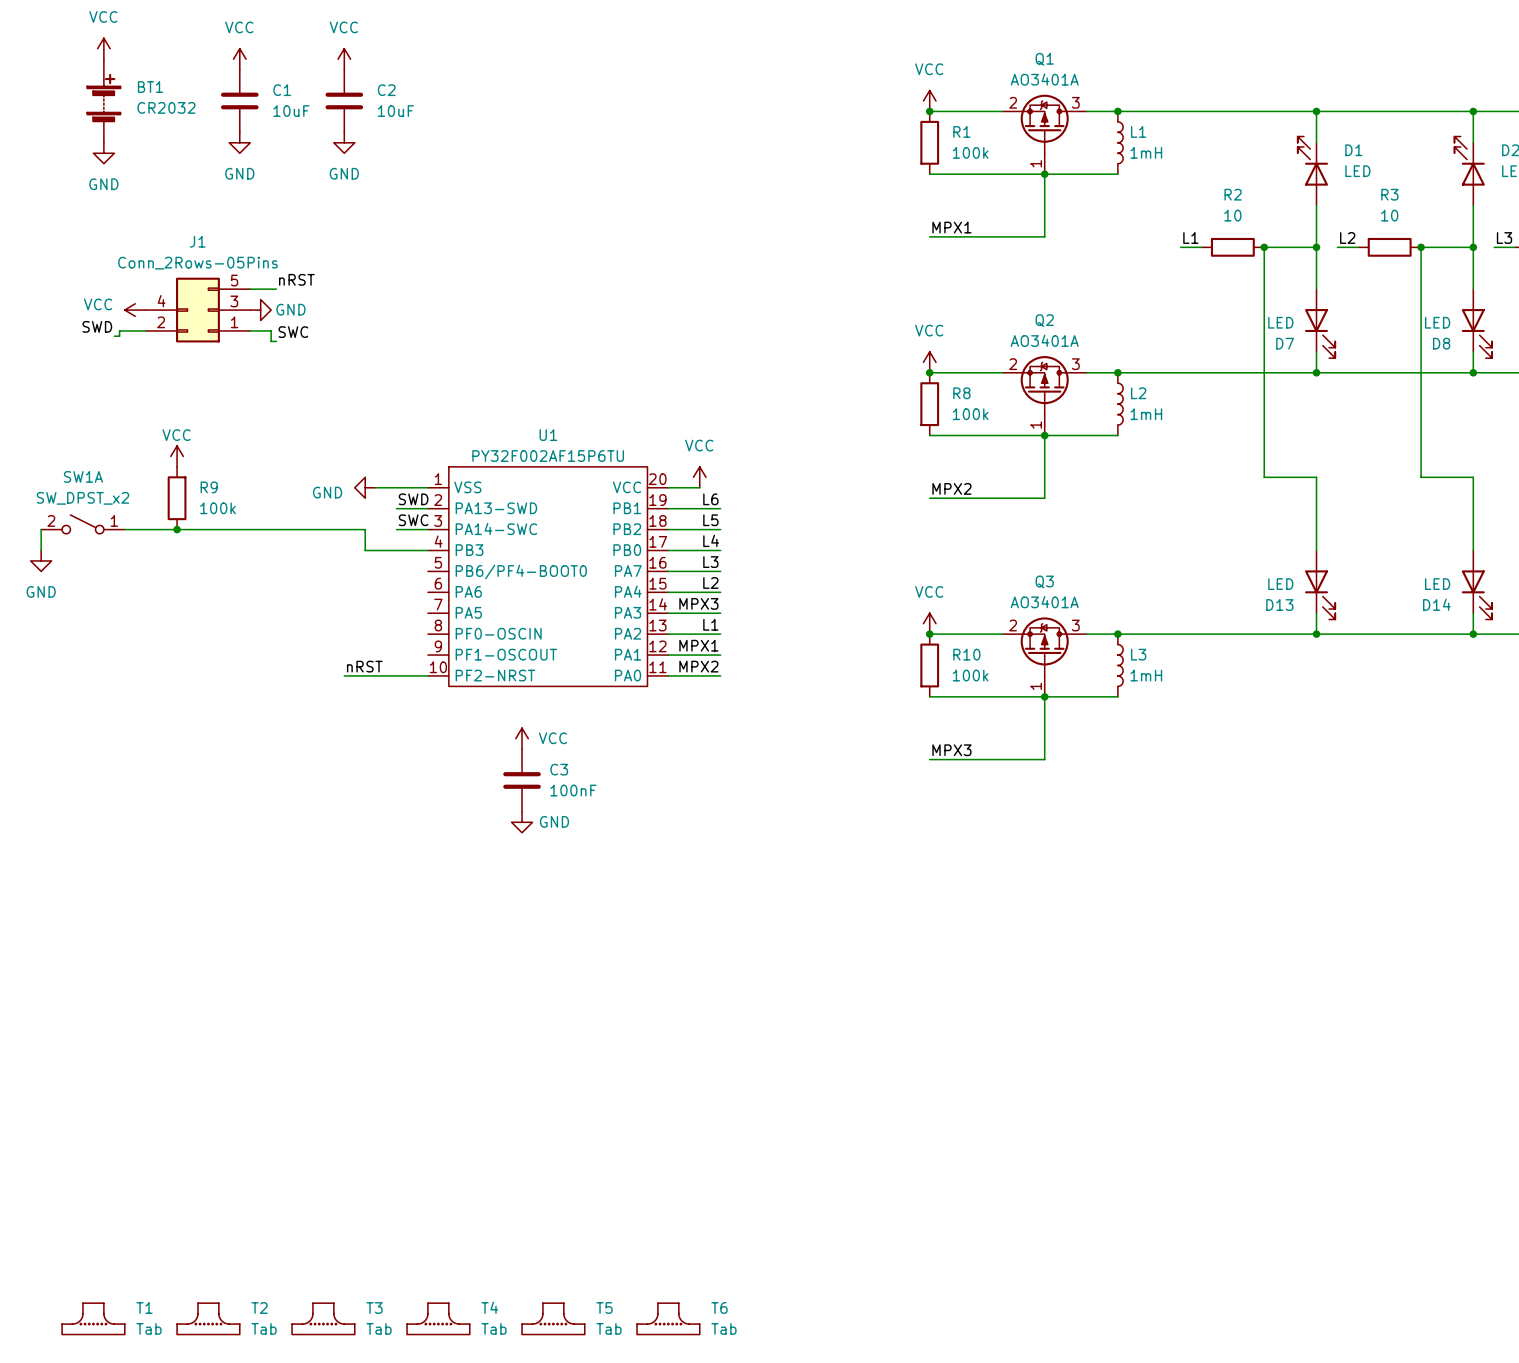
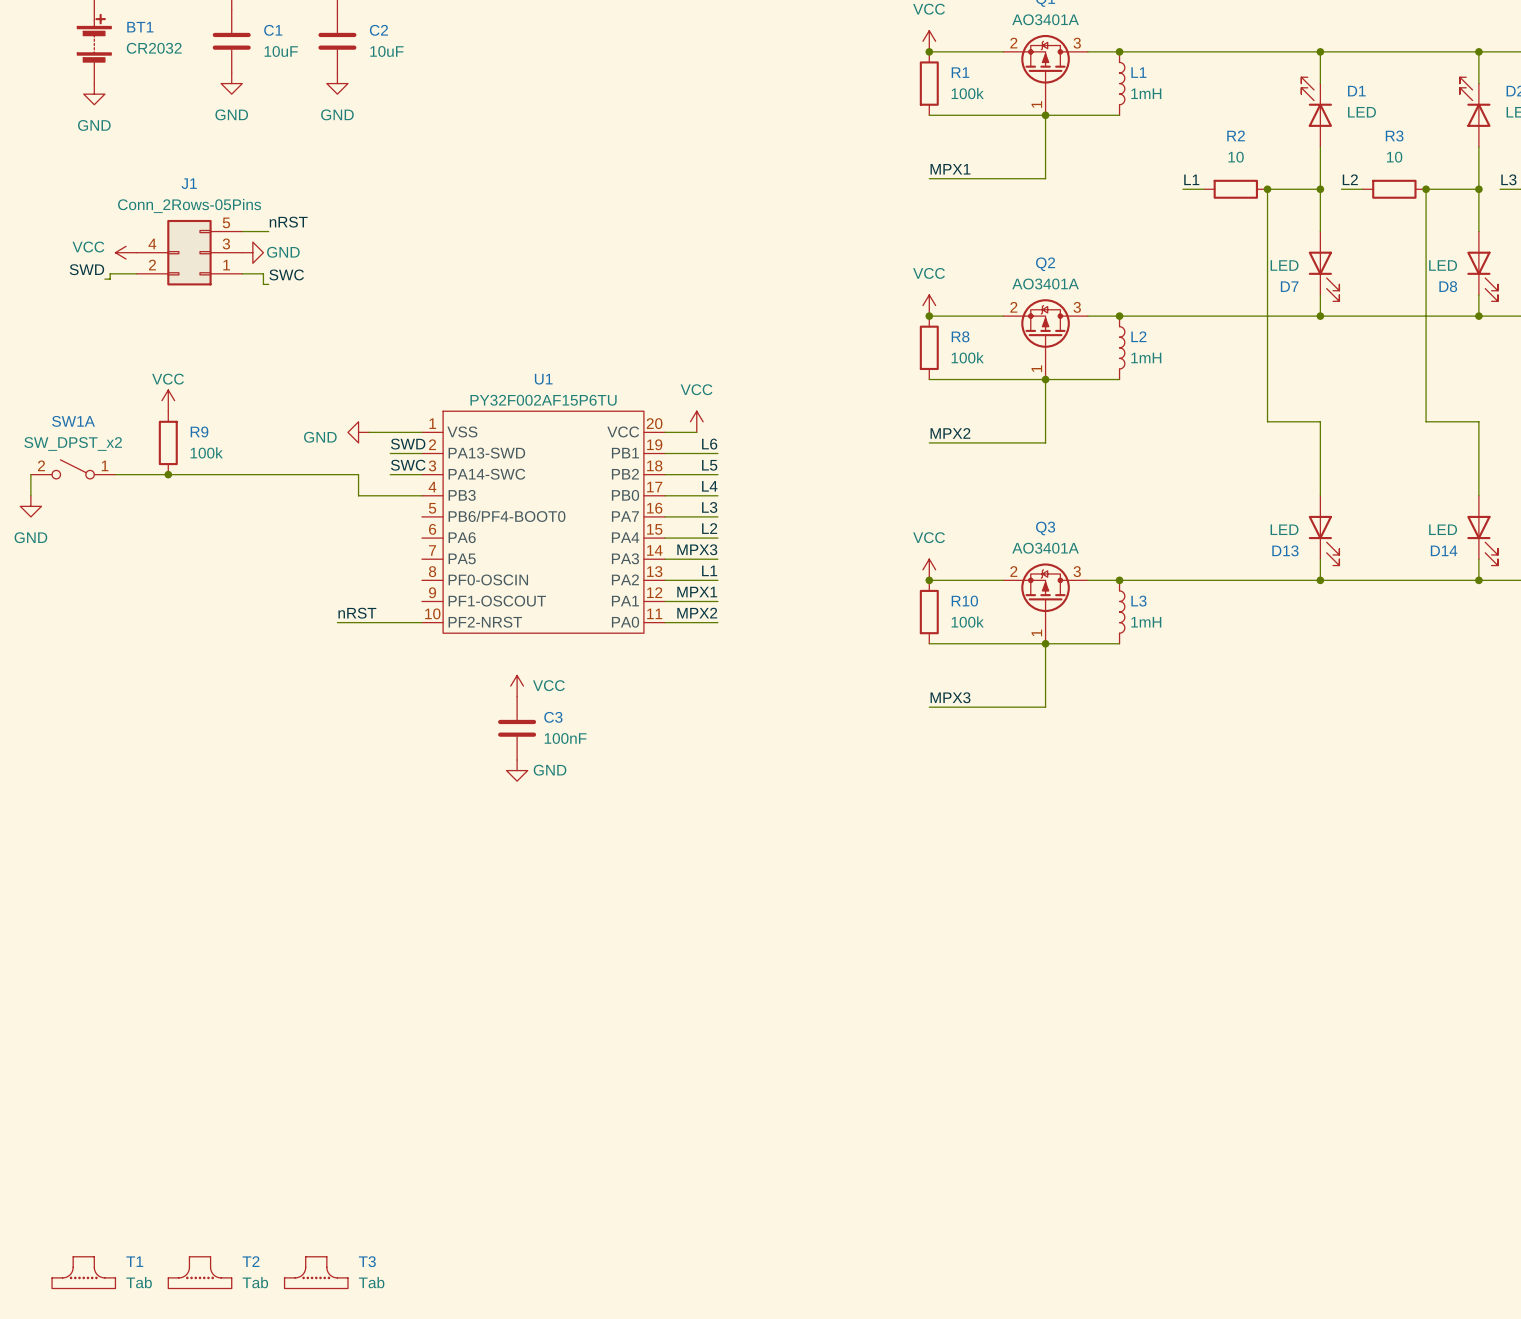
T4: Tab (438, 1318) -> none
T5: Tab (553, 1318) -> none
T6: Tab (668, 1318) -> none

